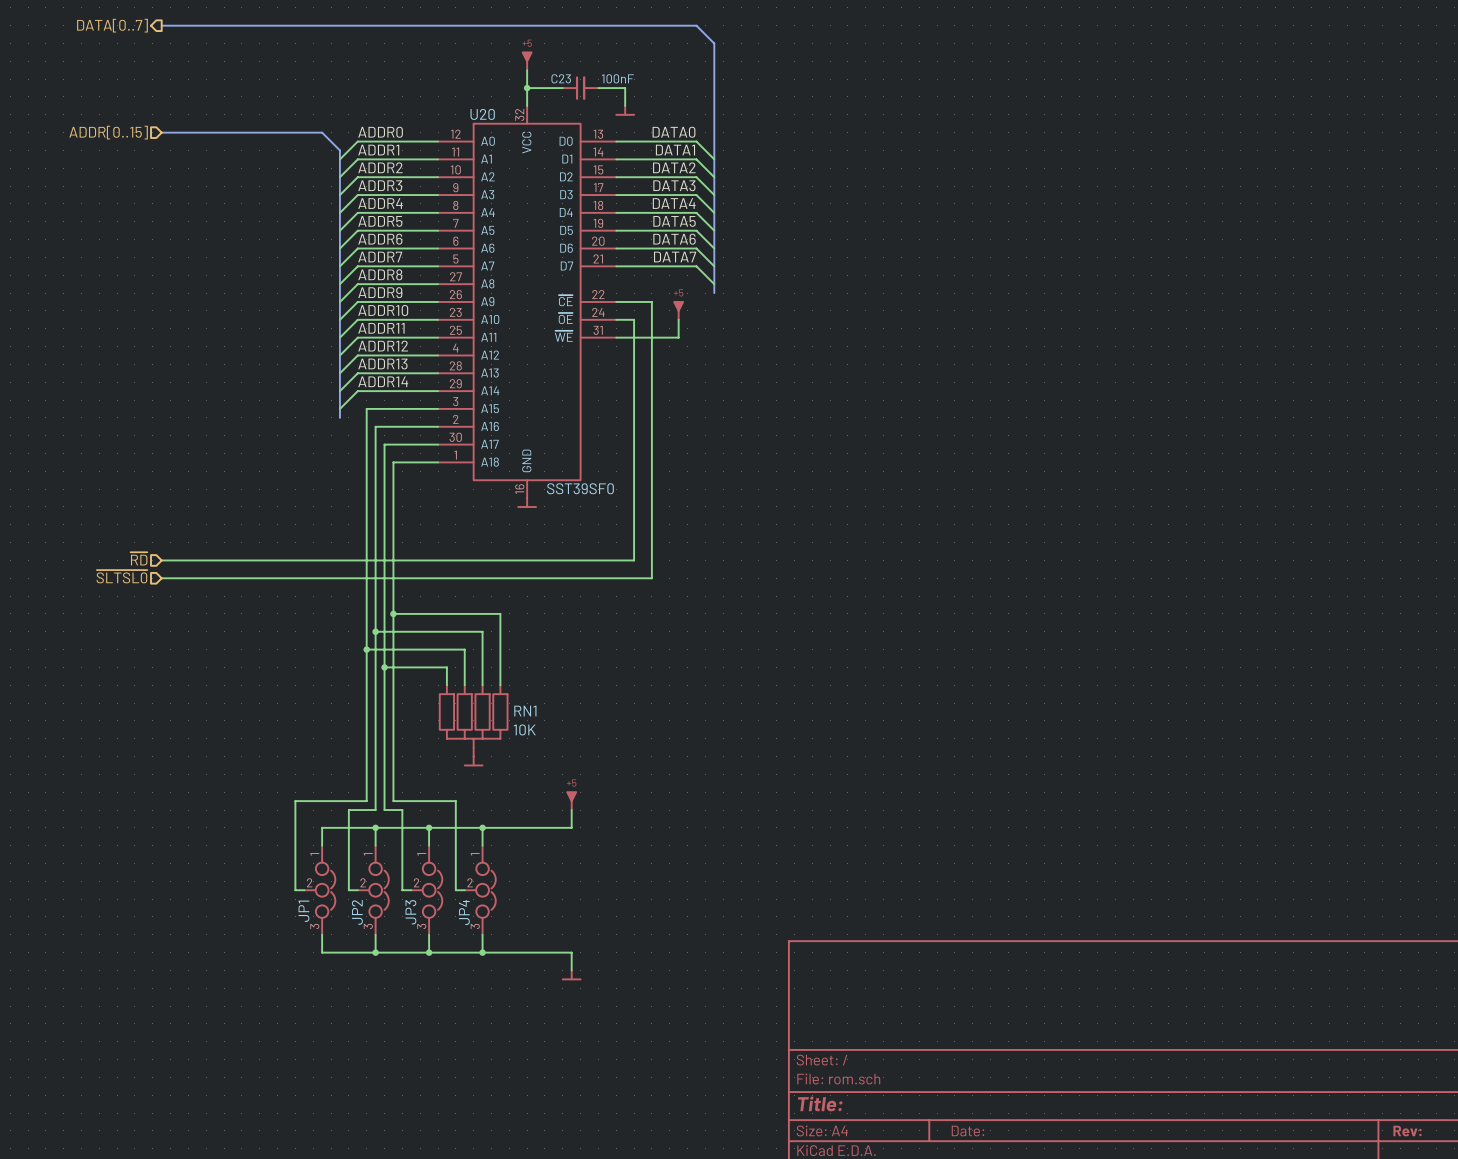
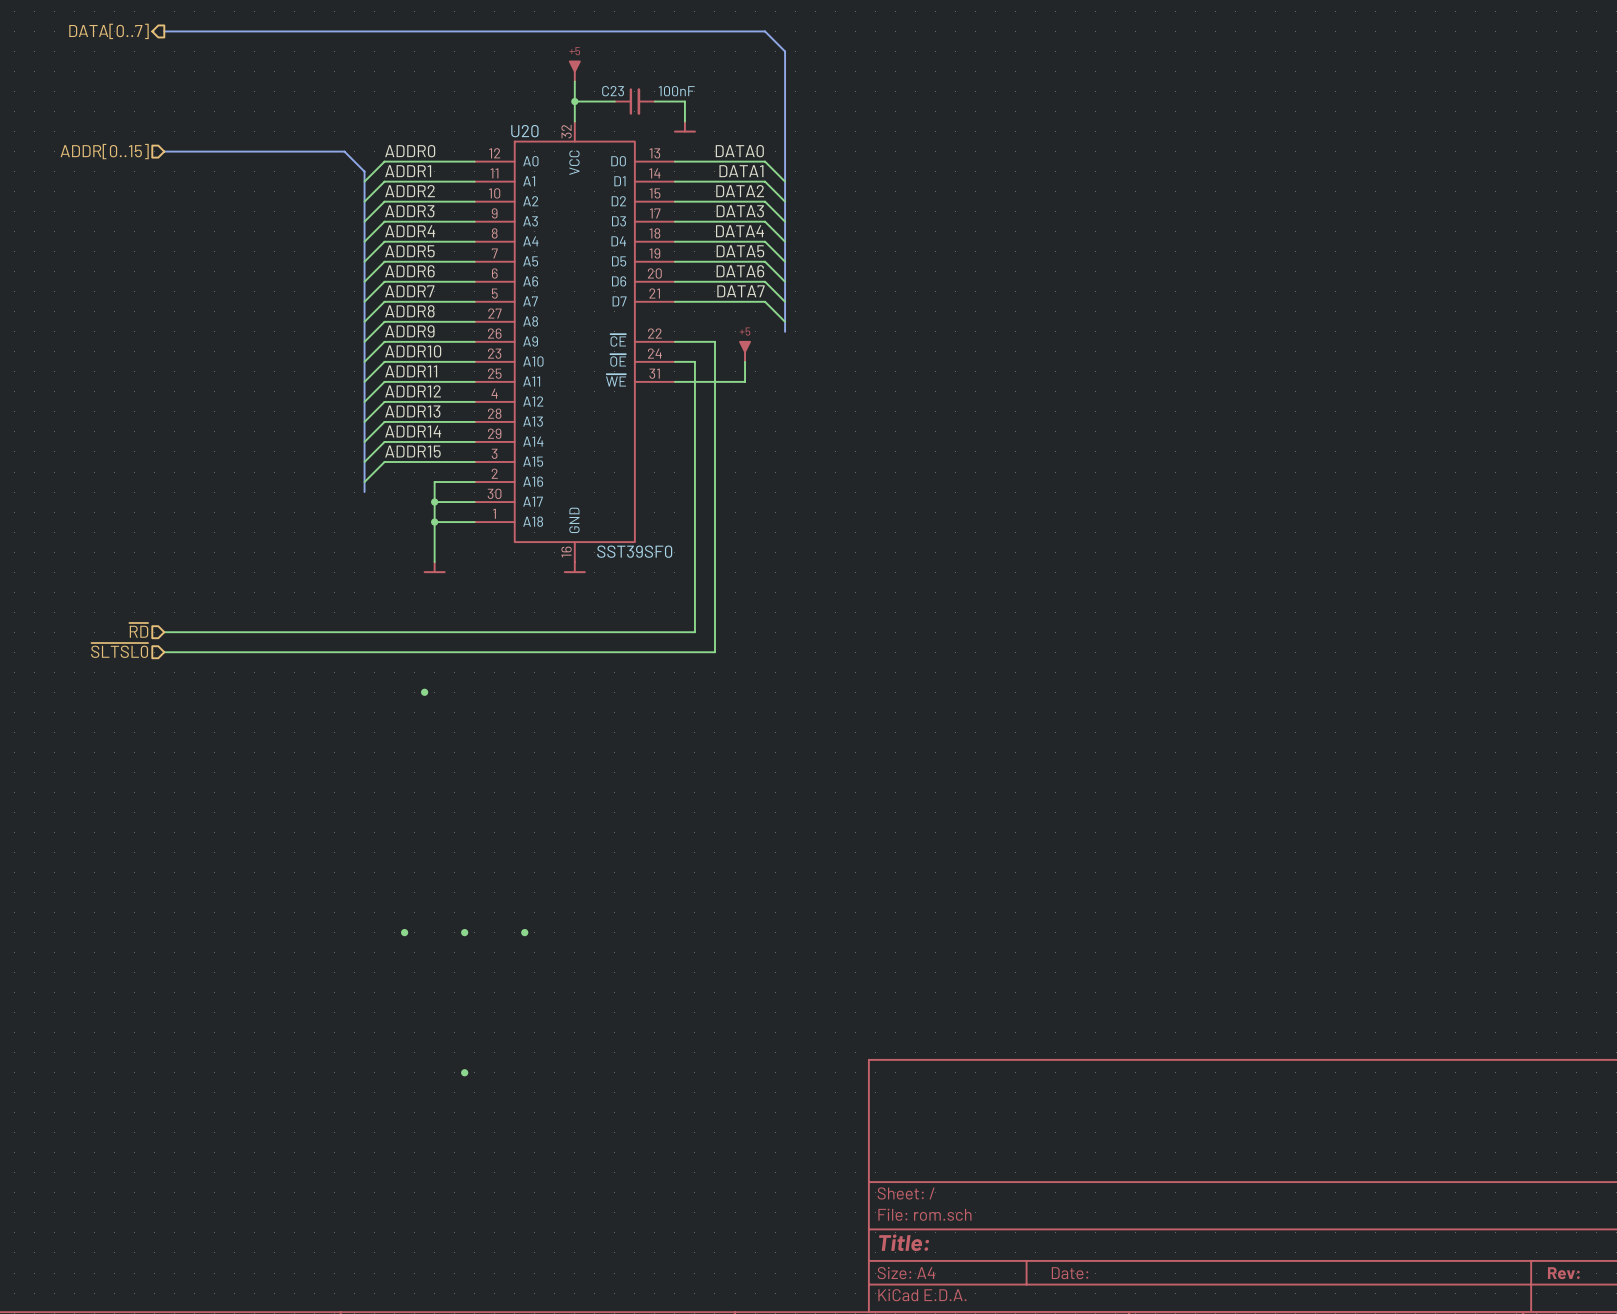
label: none -> ADDR15 (412, 451)
wire: (366, 408) (366, 801) (295, 801) (295, 890) (304, 890) -> (394, 461) (384, 461) (364, 482)
bus: none -> (364, 472) (364, 492)
wire: (402, 426) (375, 426) (375, 810) (348, 810) (348, 890) (357, 890) -> (434, 482) (434, 562)
wire: (402, 444) (384, 444) (384, 810) (402, 810) (402, 890) (411, 890) -> none
junction: none -> (434, 502)
wire: (402, 462) (393, 462) (393, 801) (455, 801) (455, 890) (464, 890) -> none
junction: none -> (434, 522)
power symbol: none -> (434, 567)
wire: (393, 613) (500, 613) (500, 685) -> none
wire: (375, 631) (482, 631) (482, 685) -> none
junction: (375, 631) -> none
wire: (366, 649) (464, 649) (464, 685) -> none
junction: (366, 649) -> none
wire: (384, 667) (446, 667) (446, 685) -> none
junction: (384, 667) -> none
RN1: 10K (473, 720) -> none
power symbol: (473, 761) -> none
power symbol: (571, 801) -> none
wire: (571, 810) (571, 827) (322, 827) (322, 845) -> none
wire: (375, 827) (375, 845) -> none
wire: (429, 827) (429, 845) -> none
wire: (482, 827) (482, 845) -> none
JP1: (319, 890) -> none
JP2: (373, 890) -> none
JP3: (426, 890) -> none
JP4: (480, 890) -> none
wire: (322, 934) (322, 952) (571, 952) (571, 970) -> none
wire: (375, 934) (375, 952) -> none
wire: (429, 934) (429, 952) -> none
wire: (482, 934) (482, 952) -> none
junction: (375, 952) -> none
junction: (482, 952) -> none
power symbol: (571, 975) -> none

